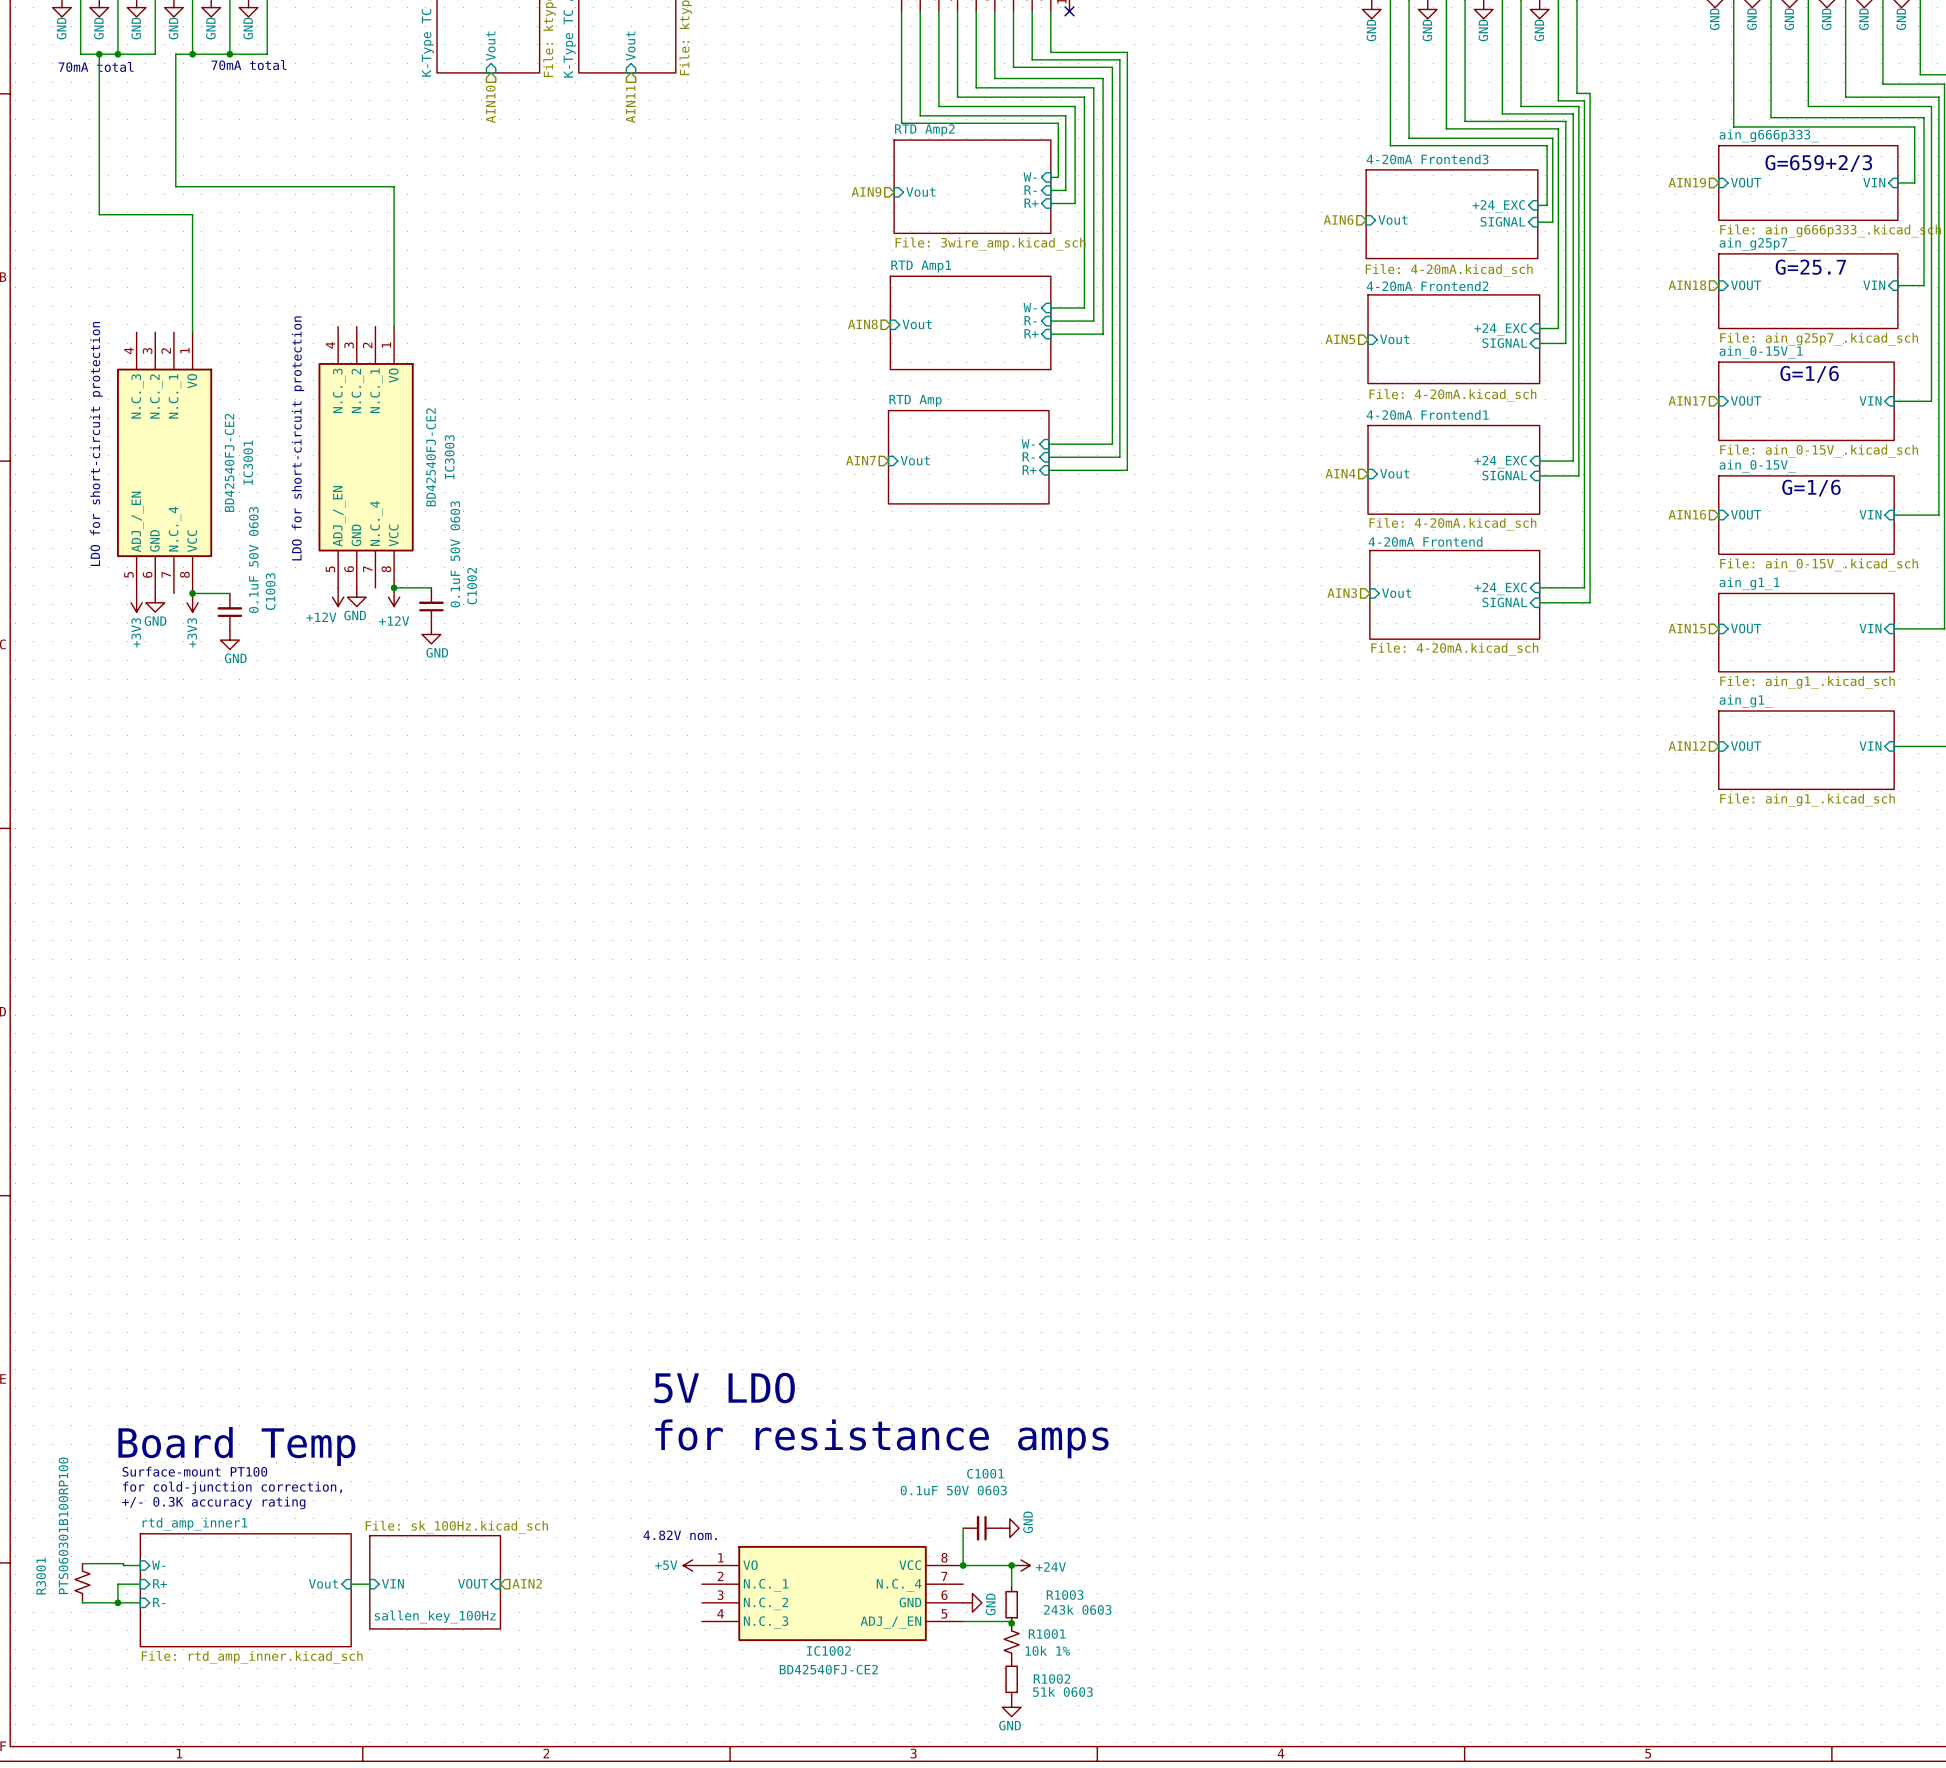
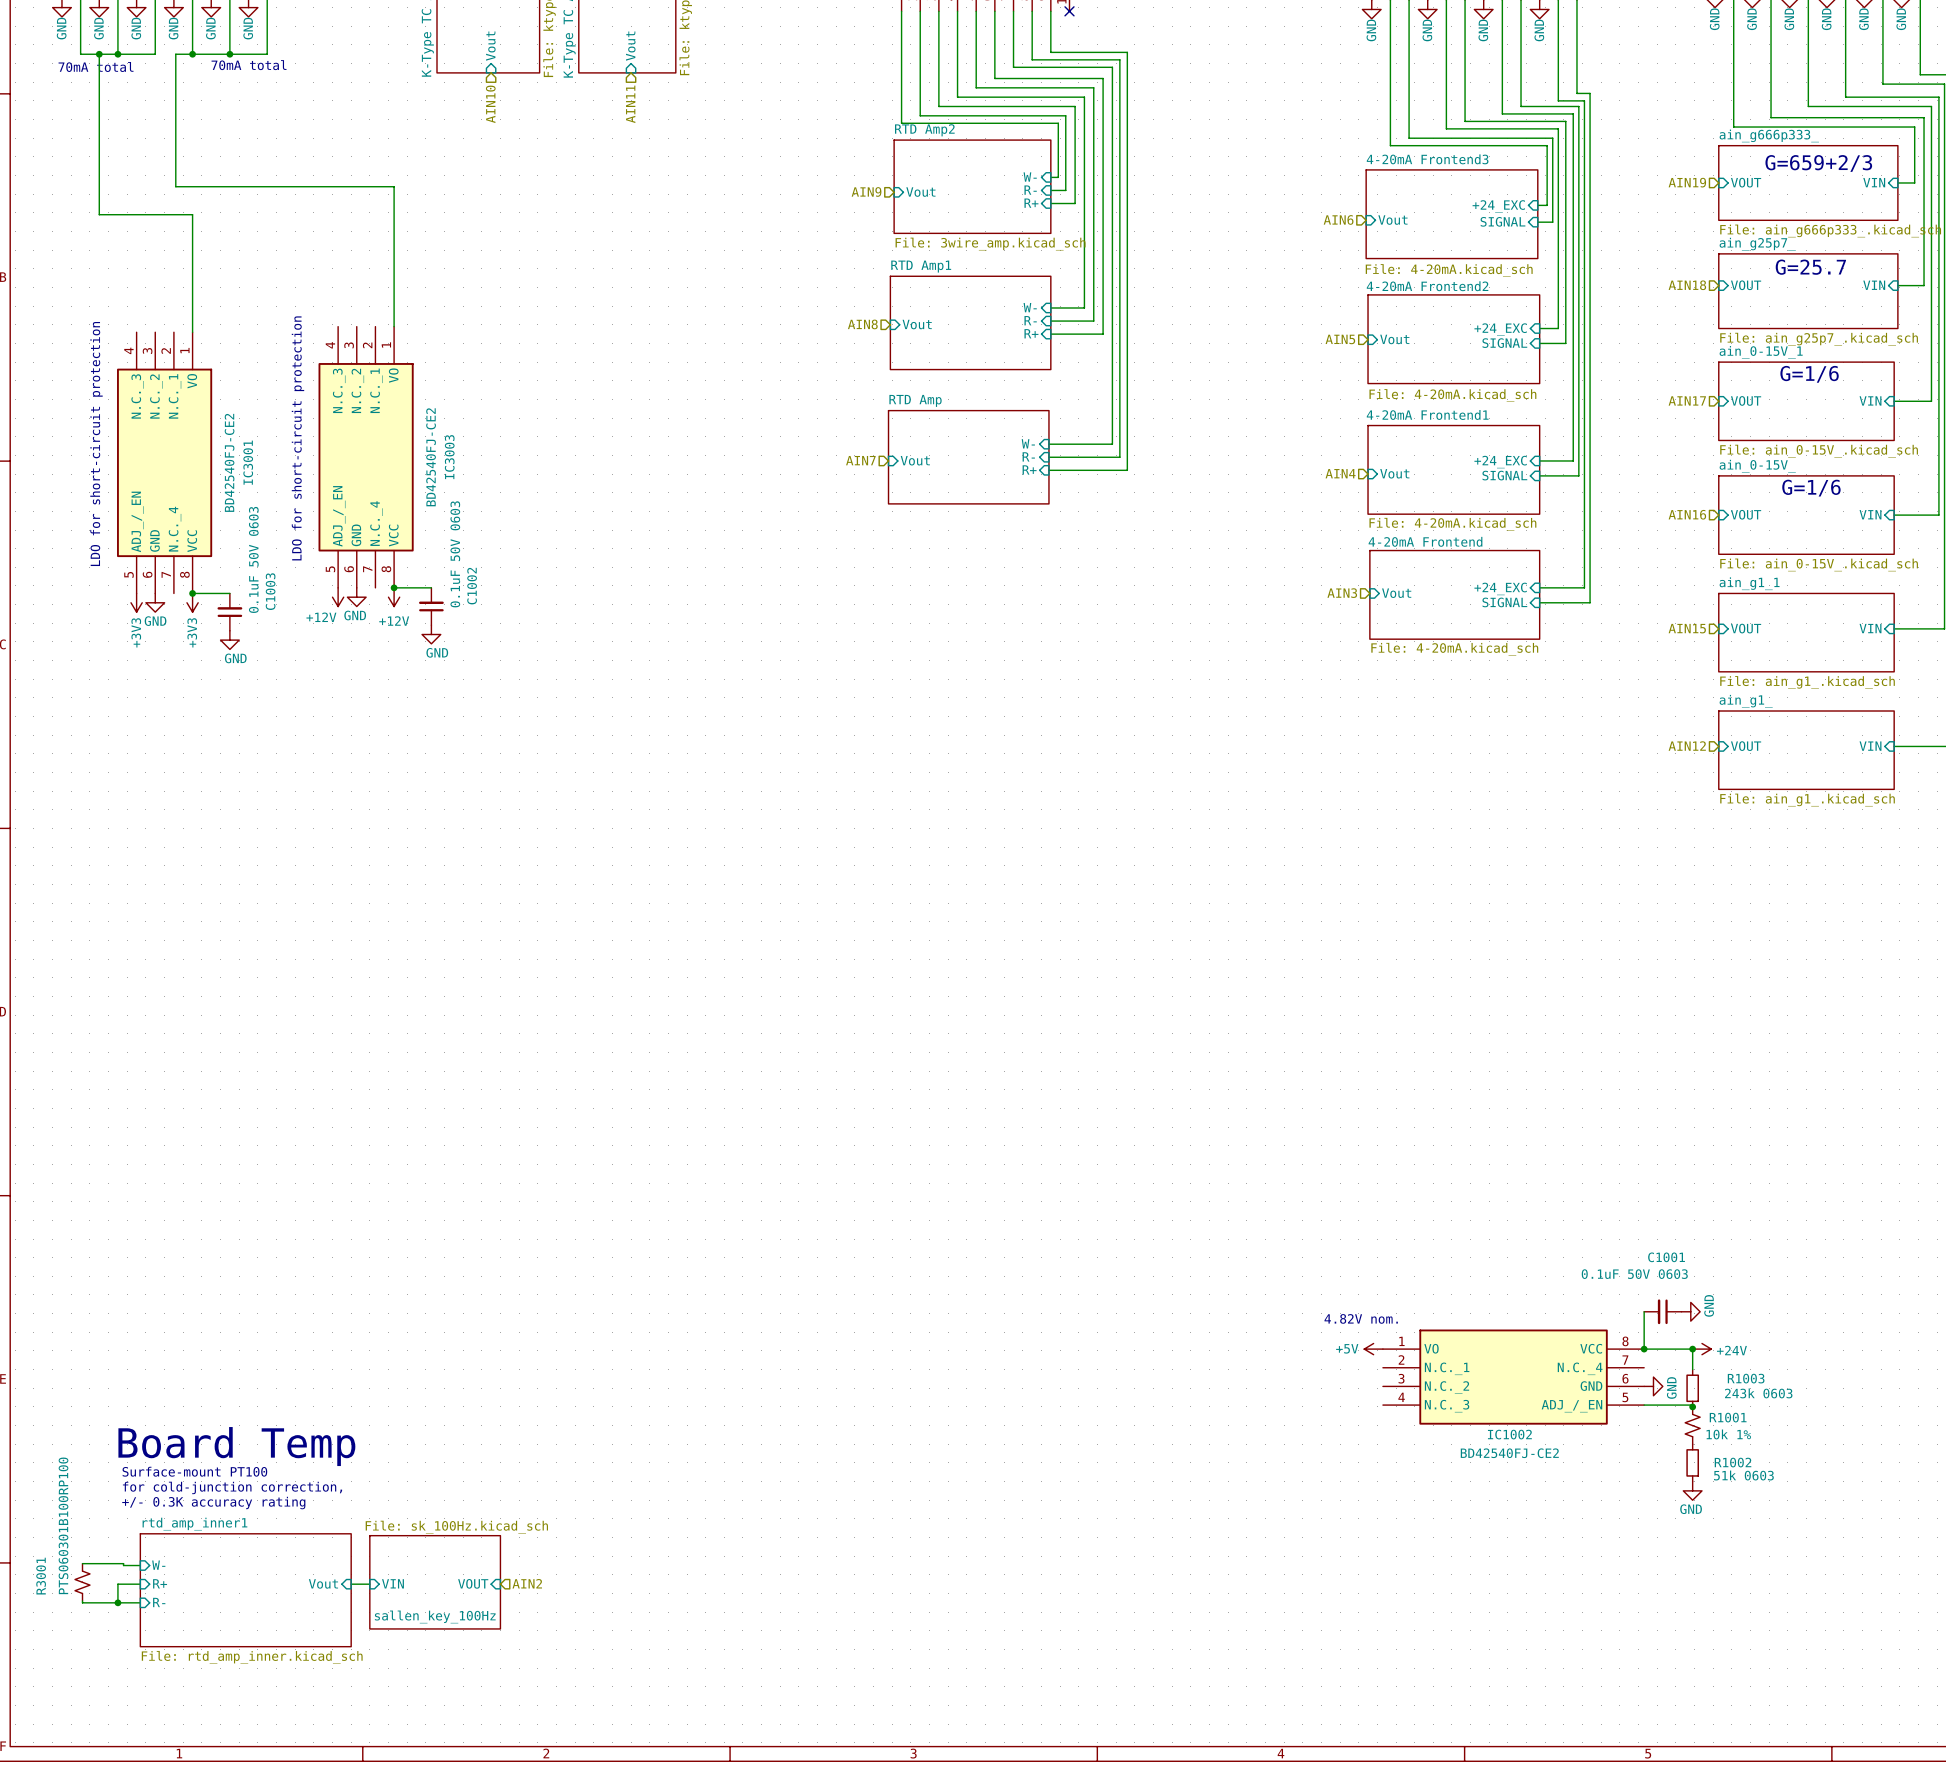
wire: none -> (1644, 1311) (1644, 1349) (1692, 1349) (1692, 1369)
power symbol: none -> GND (1690, 1311)
text: none -> 4.82V nom. (1361, 1318)
power symbol: none -> +5V (1373, 1349)
junction: none -> (1644, 1349)
junction: none -> (1692, 1349)
power symbol: none -> +24V (1701, 1349)
power symbol: none -> GND (1653, 1386)
text: 5V LDO (724, 1388) -> none
wire: none -> (1644, 1405) (1692, 1405) (1692, 1406)
junction: none -> (1692, 1406)
text: for resistance amps (881, 1438) -> none
power symbol: none -> GND (1692, 1490)
wire: (963, 1528) (963, 1565) (1011, 1565) (1011, 1586) -> none
C1001 position: (981, 1528) -> (1662, 1311)
power symbol: GND (1009, 1528) -> none
text: 4.82V nom. (680, 1535) -> none
power symbol: +5V (692, 1565) -> none
junction: (963, 1565) -> none
junction: (1011, 1565) -> none
power symbol: +24V (1020, 1565) -> none
IC1002 position: (832, 1593) -> (1513, 1377)
power symbol: GND (972, 1602) -> none
R1003 position: (1011, 1604) -> (1692, 1388)
wire: (963, 1621) (1011, 1621) (1011, 1623) -> none
junction: (1011, 1623) -> none
R1001 position: (1011, 1642) -> (1692, 1425)
R1002 position: (1011, 1679) -> (1692, 1462)
power symbol: GND (1011, 1707) -> none

